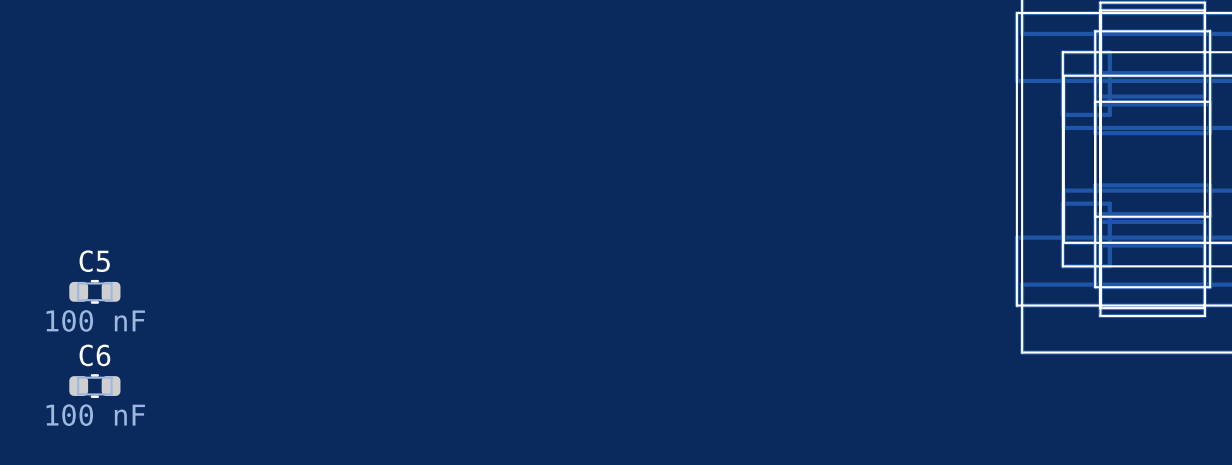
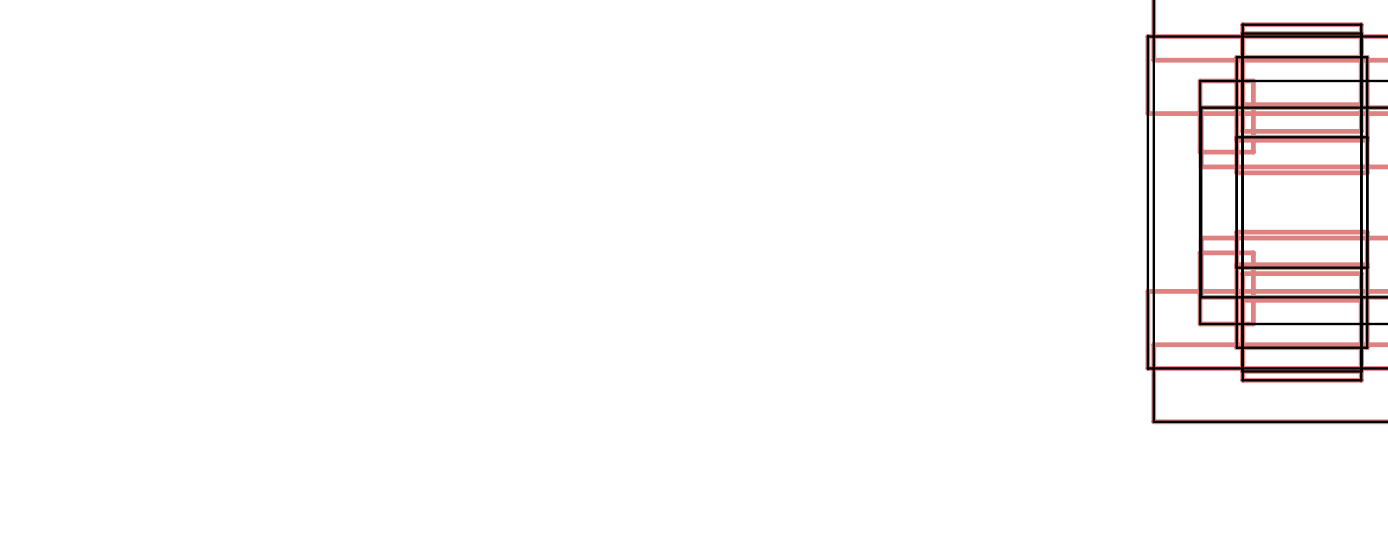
C5: 100 nF (94, 291) -> none
C6: 100 nF (94, 386) -> none

